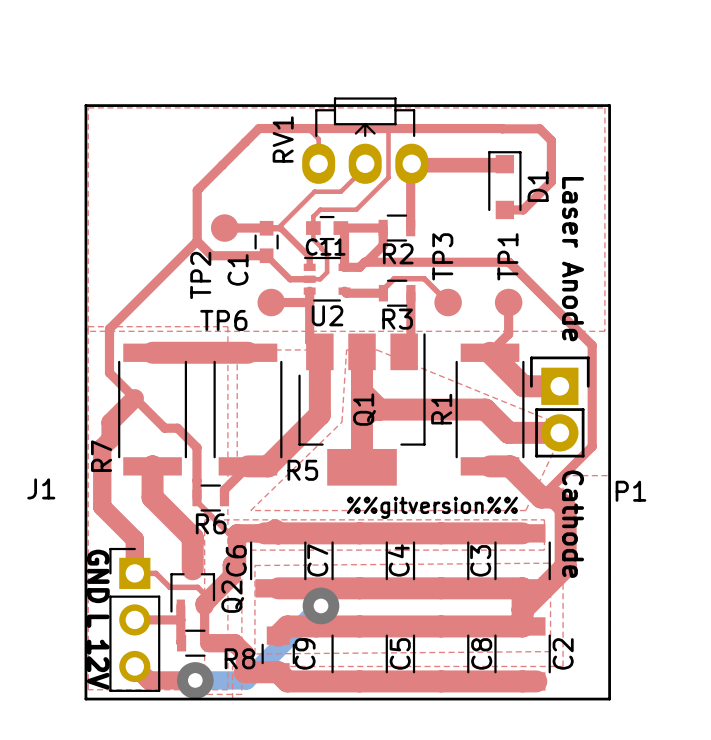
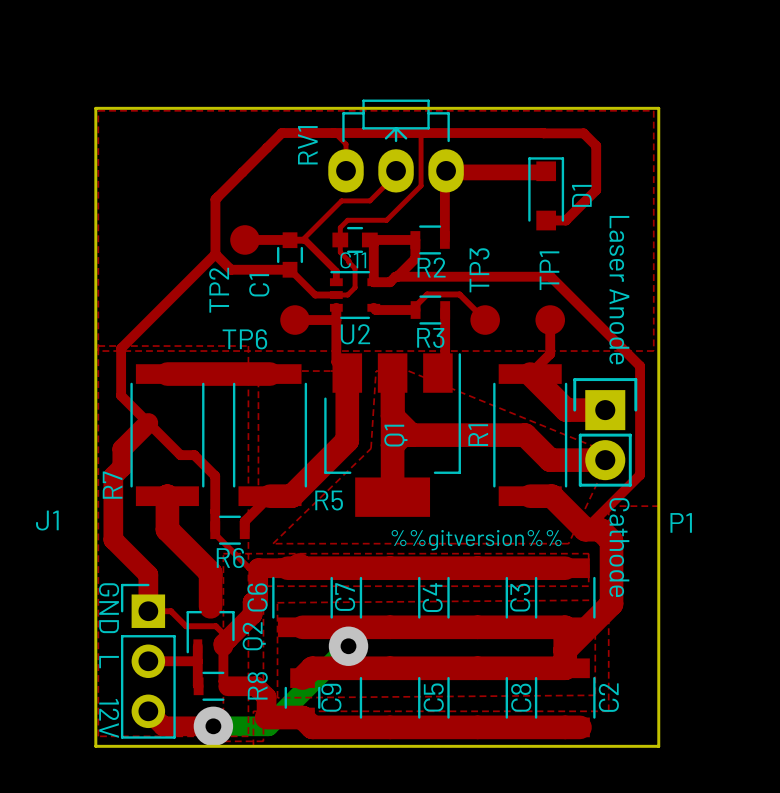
R8 name rotation: 0° (239, 658) -> 90° counterclockwise (257, 685)

